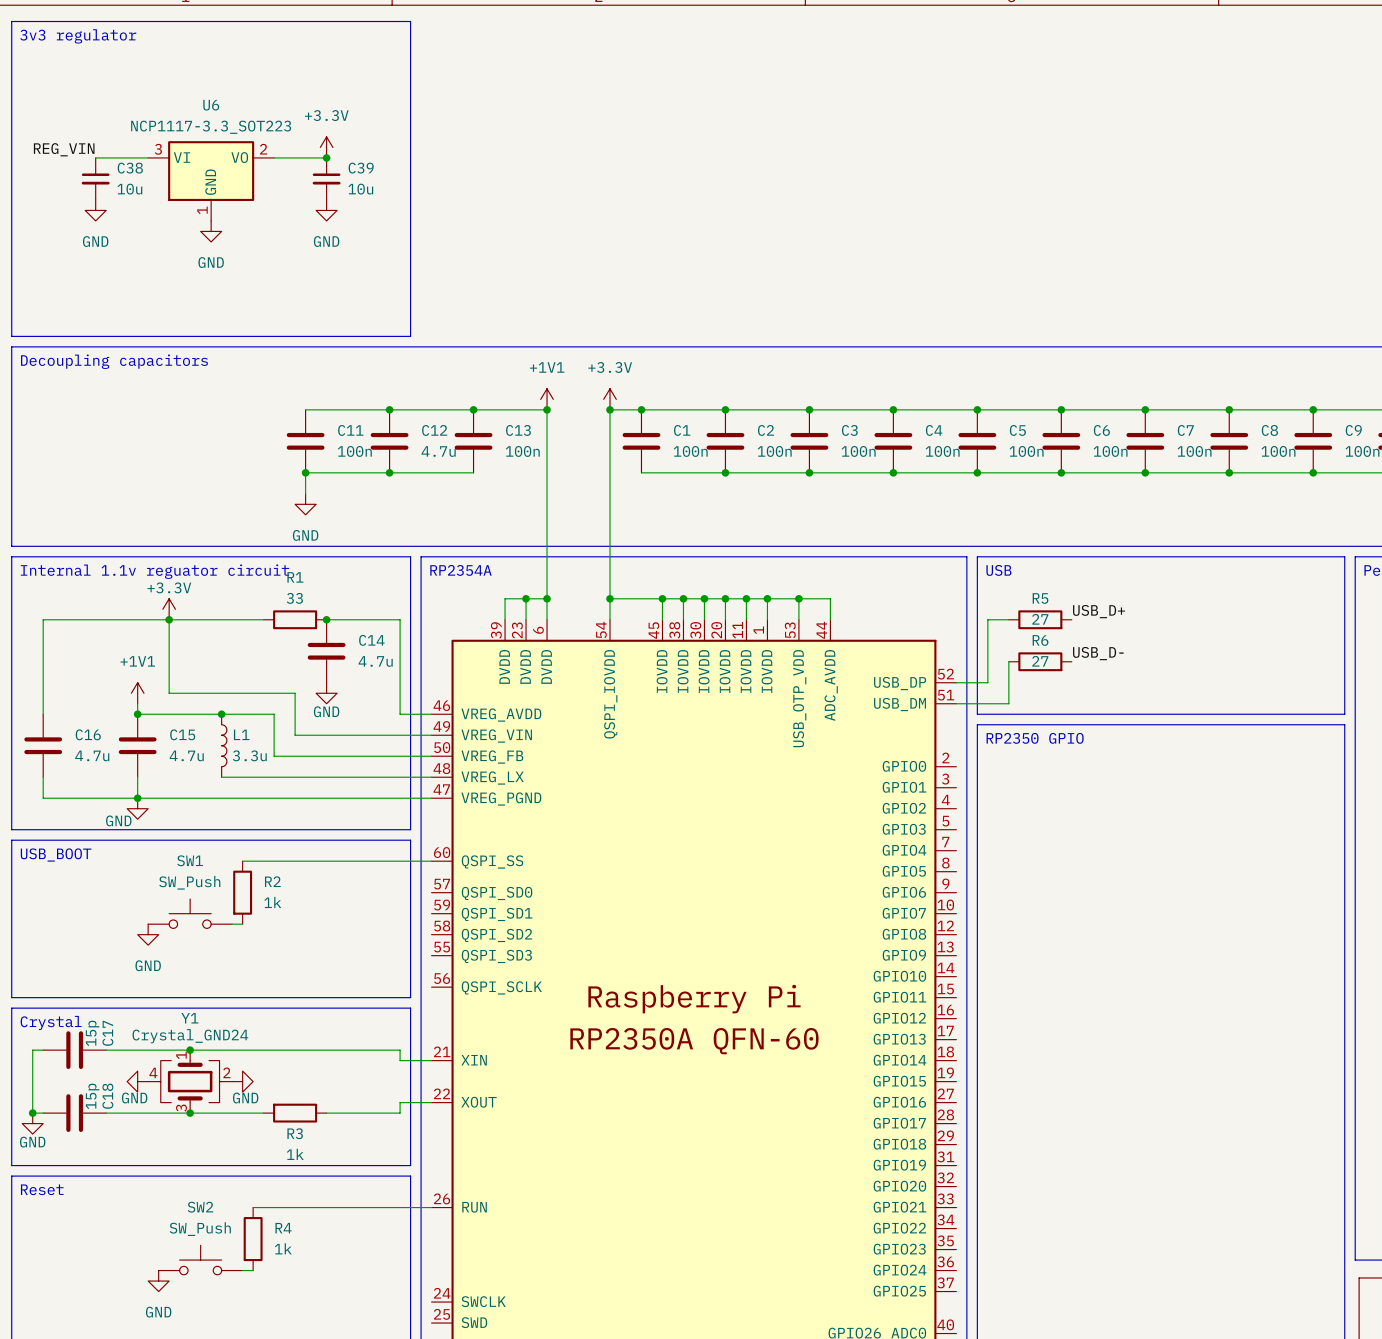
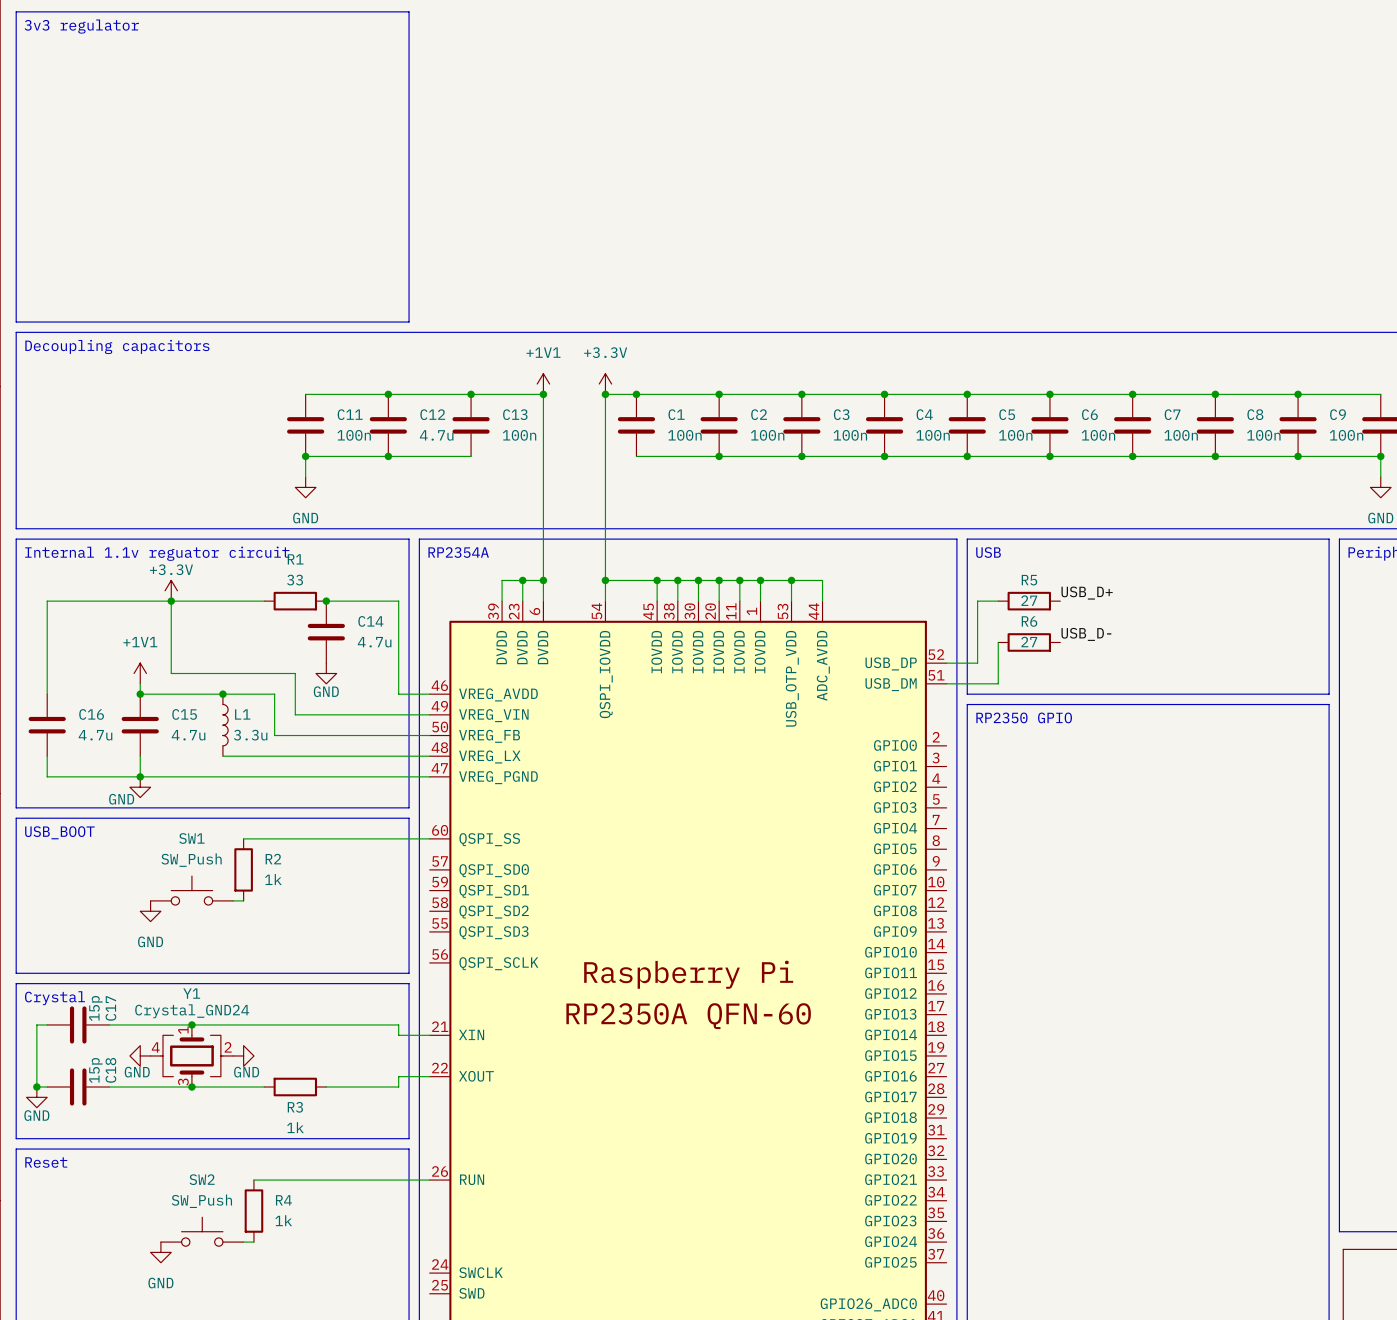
power symbol: +3.3V (326, 147) -> none
label: REG_VIN (64, 149) -> none
wire: (95, 157) (148, 157) -> none
wire: (274, 157) (326, 157) -> none
junction: (326, 157) -> none
C38: 10u (95, 178) -> none
C39: 10u (326, 178) -> none
U6: NCP1117-3.3_SOT223 (211, 181) -> none
power symbol: GND (95, 210) -> none
power symbol: GND (326, 210) -> none
power symbol: GND (211, 231) -> none

